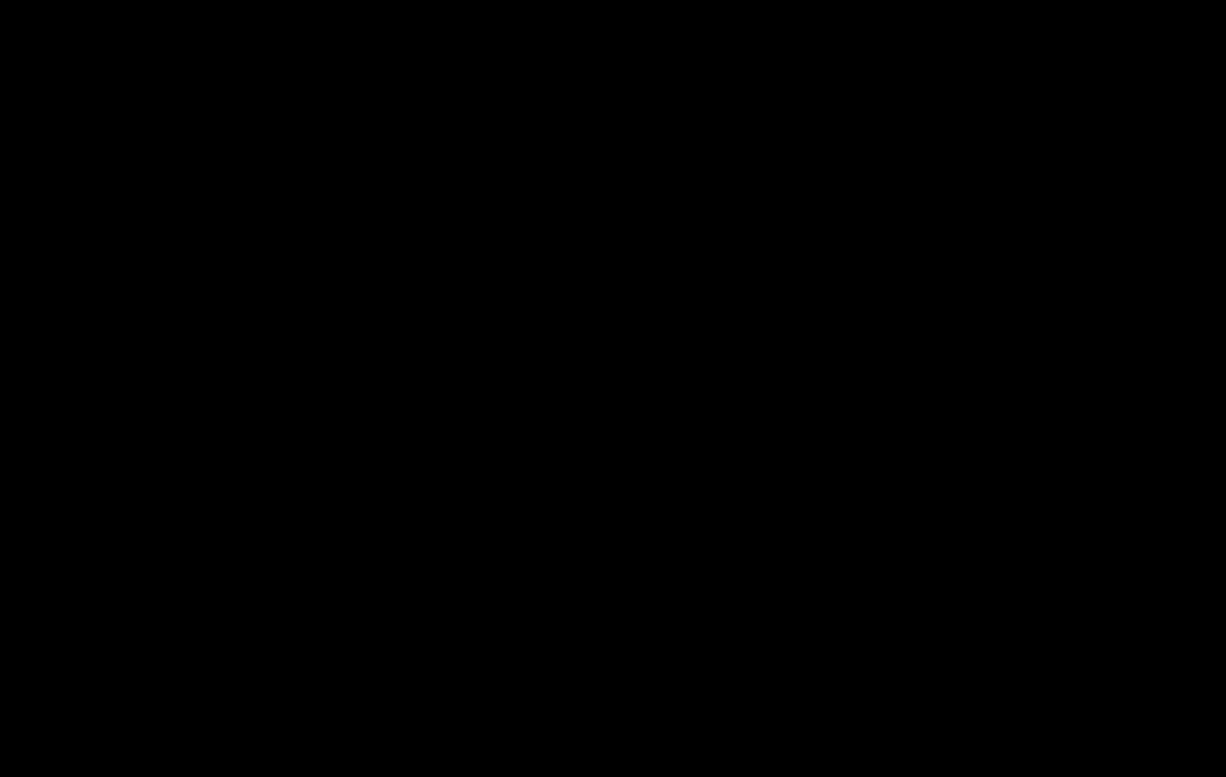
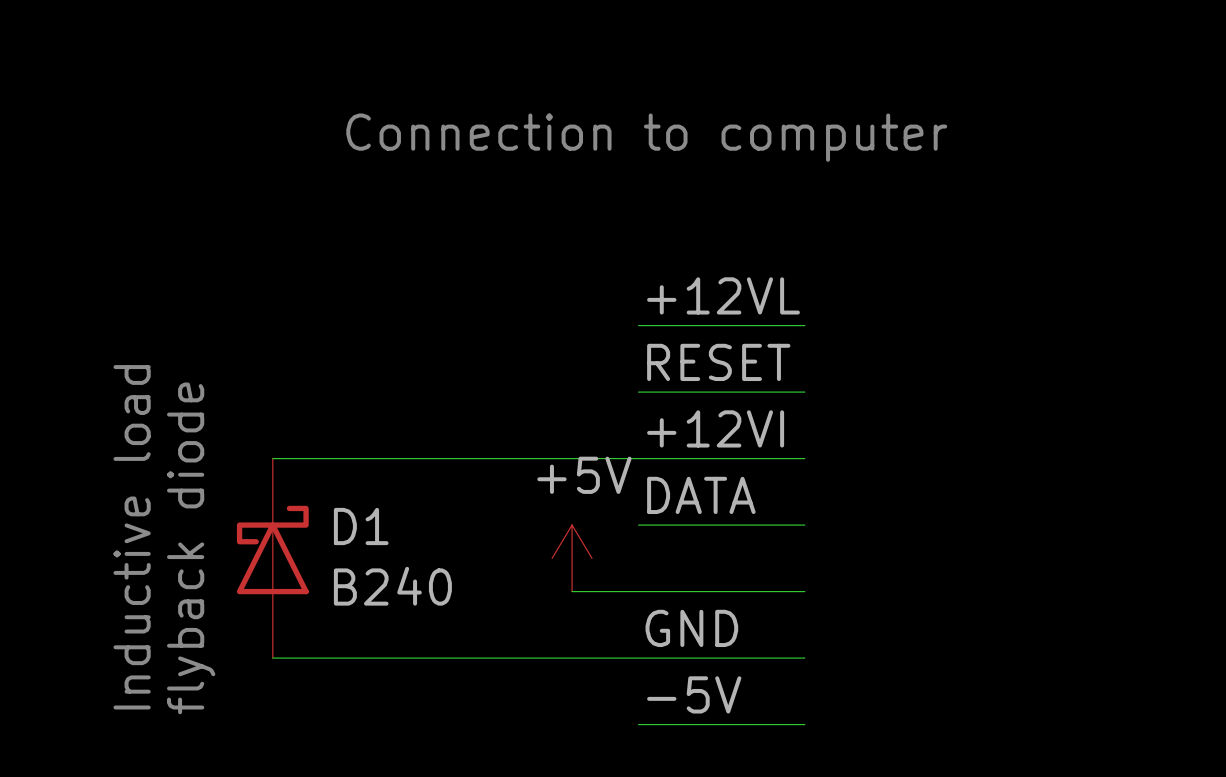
text: none -> Connection to computer (646, 137)
label: none -> +12VL (723, 295)
wire: none -> (638, 325) (804, 325)
label: none -> RESET (718, 362)
wire: none -> (638, 392) (804, 392)
label: none -> +12VI (715, 428)
wire: none -> (272, 458) (804, 458)
label: none -> DATA (701, 495)
wire: none -> (638, 525) (804, 525)
text: none -> Inductive load (132, 537)
text: none -> flyback diode (191, 548)
D1: none -> B240 (272, 558)
power symbol: none -> +5V (572, 558)
wire: none -> (572, 591) (804, 591)
label: none -> GND (691, 628)
wire: none -> (272, 658) (804, 658)
label: none -> -5V (694, 694)
wire: none -> (638, 724) (804, 724)

